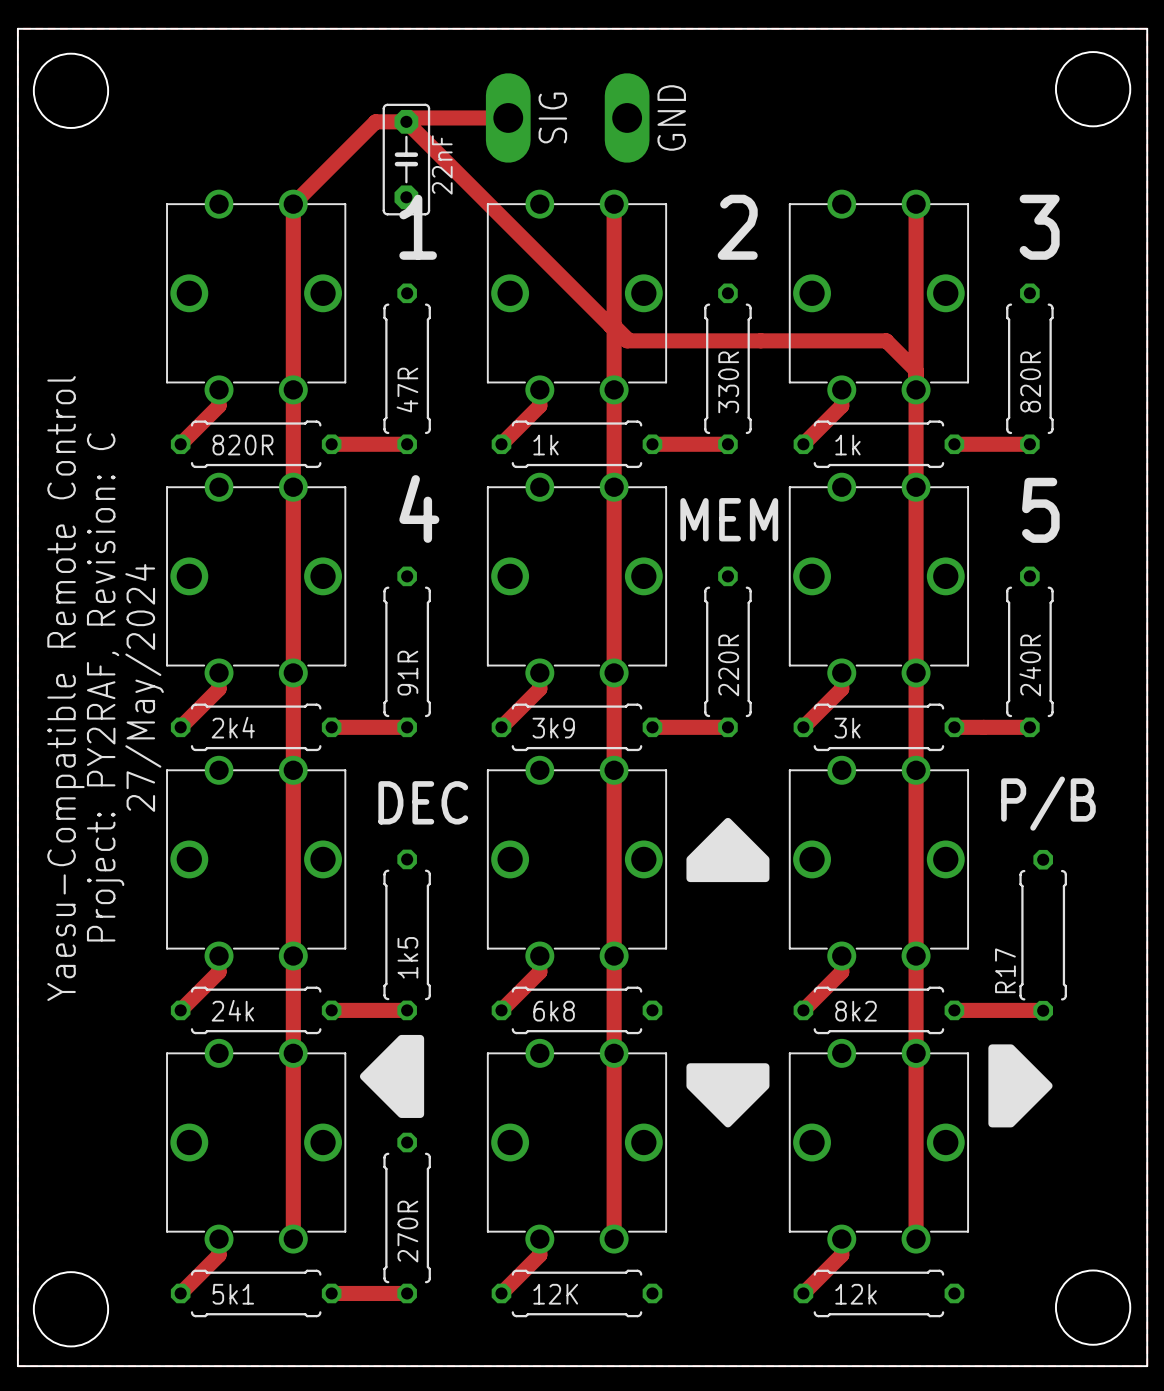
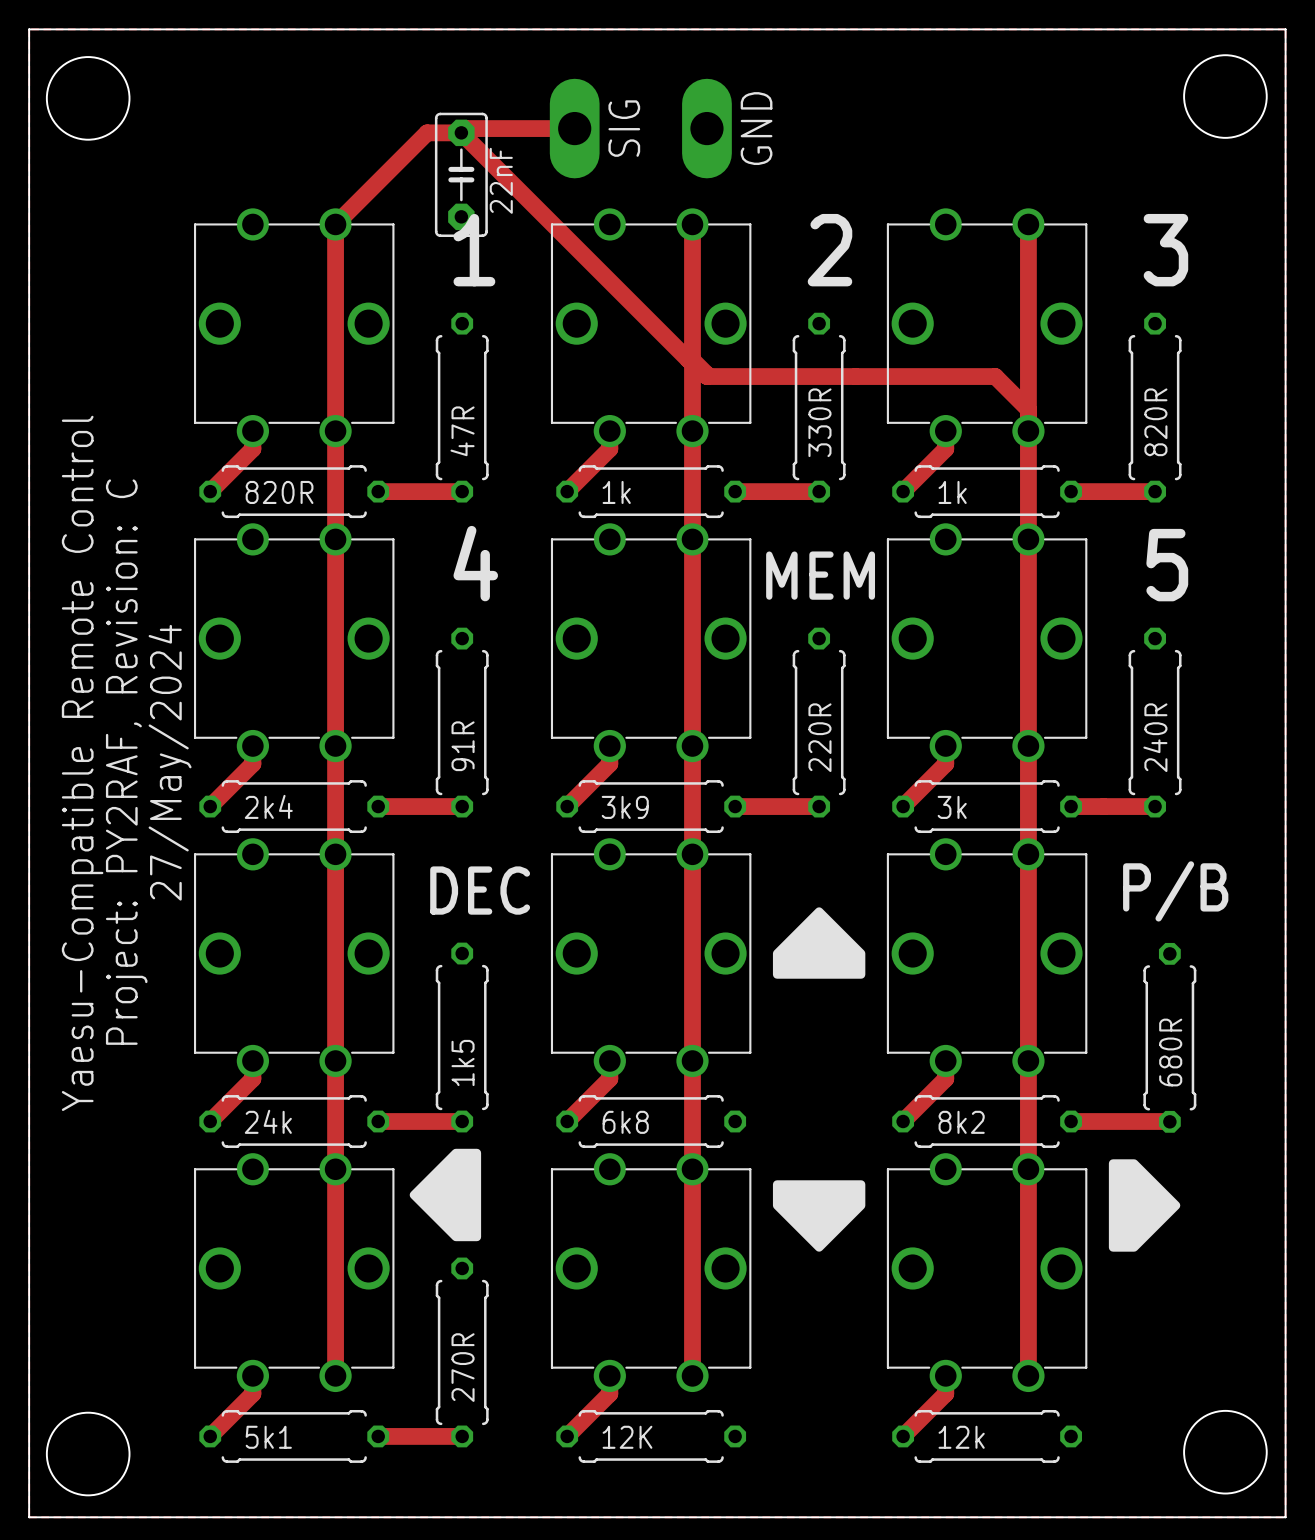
R17 value: none -> 680R (1170, 1052)
R17 name: R17 (1005, 970) -> none

